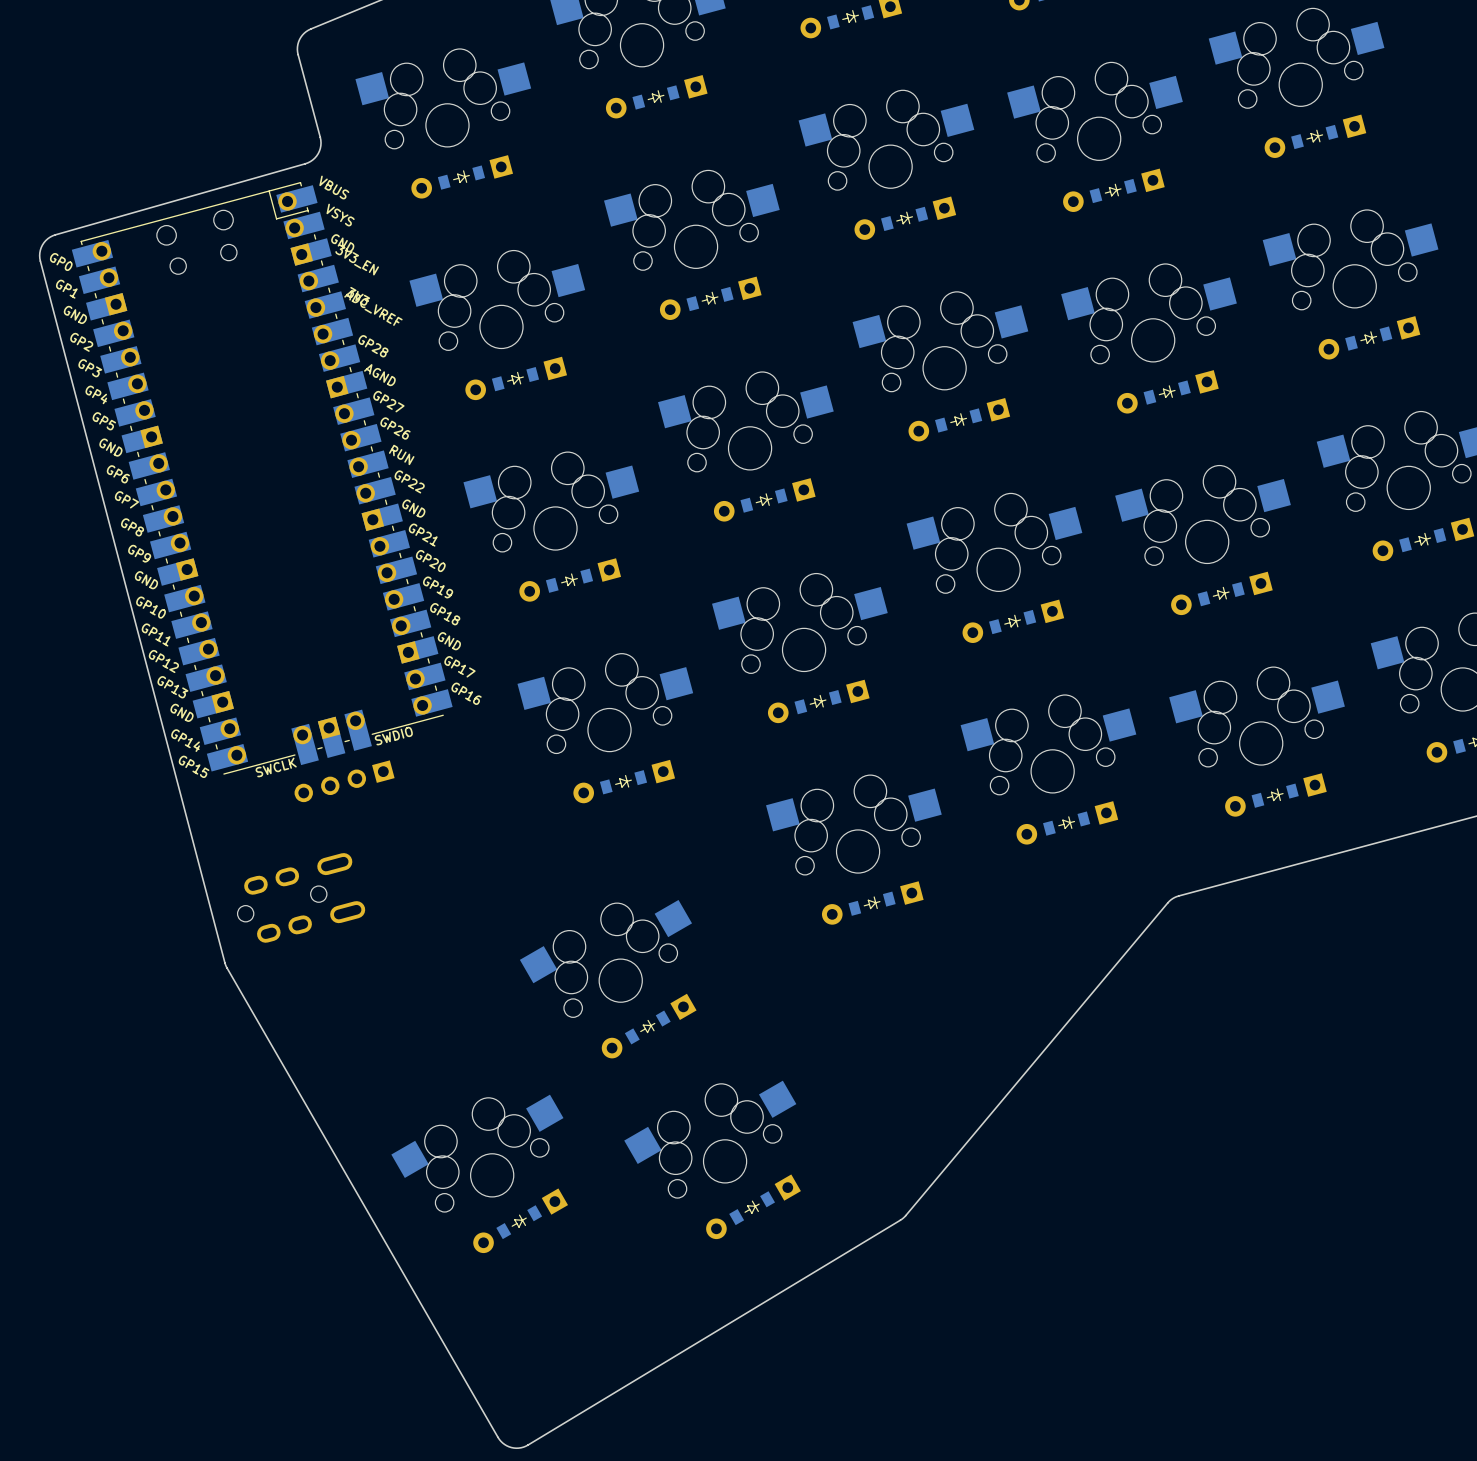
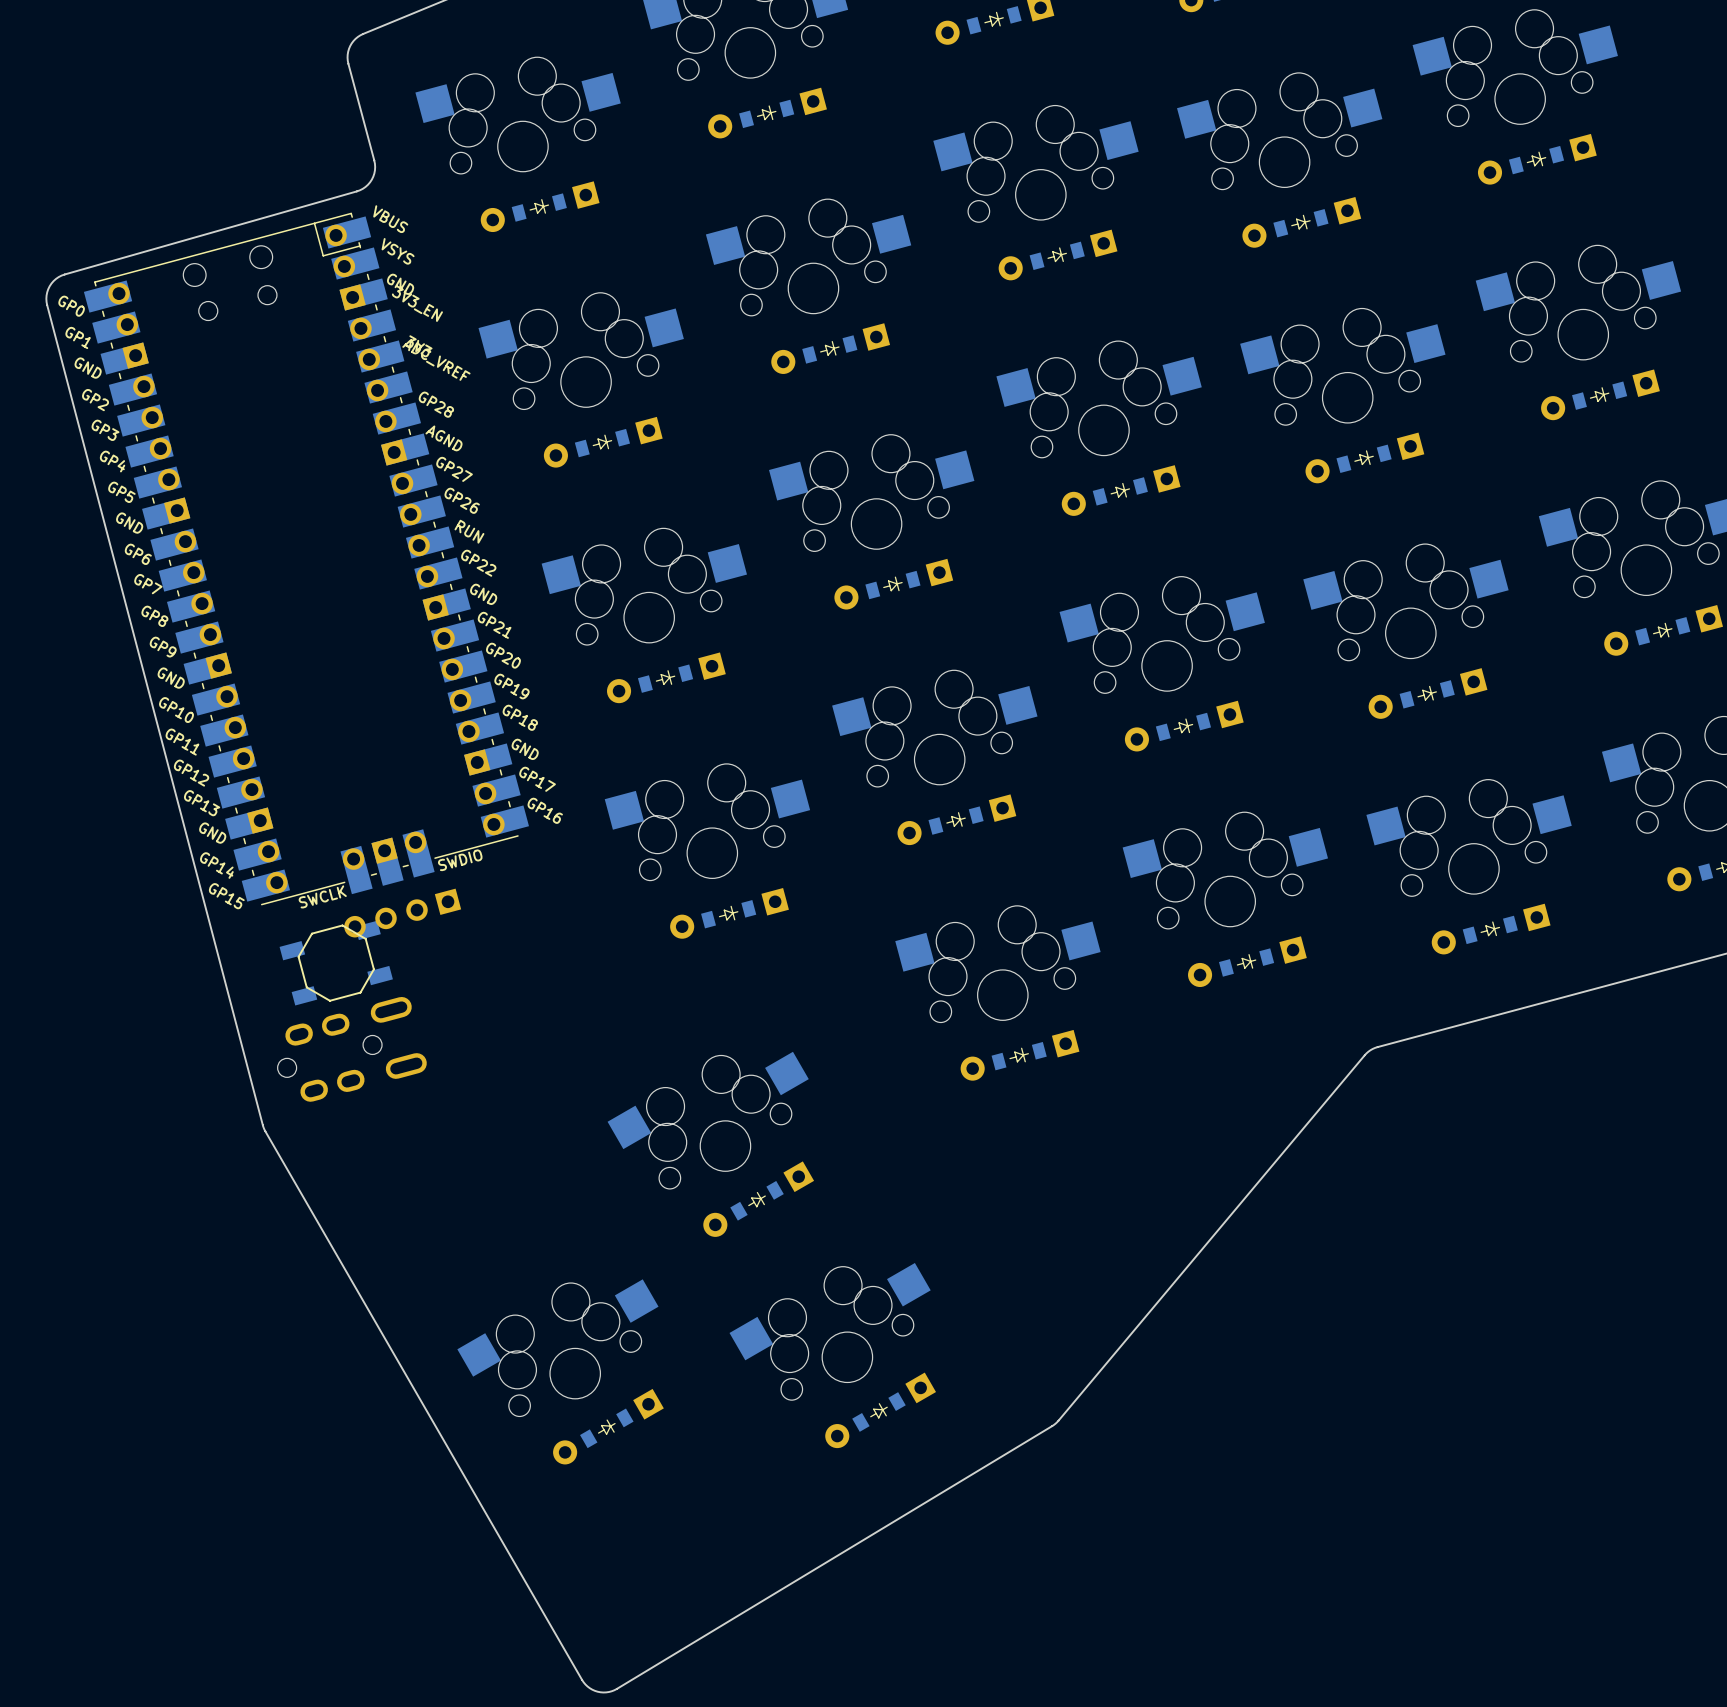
part: none -> (336, 963)

